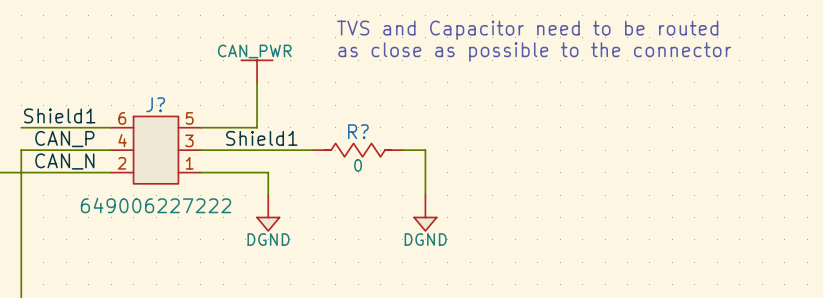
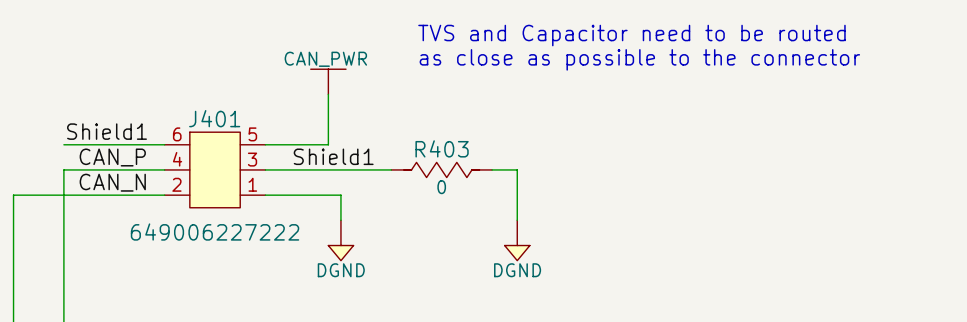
J? name: J? (155, 104) -> J401 (214, 118)
R? name: R? (358, 131) -> R403 (442, 148)

